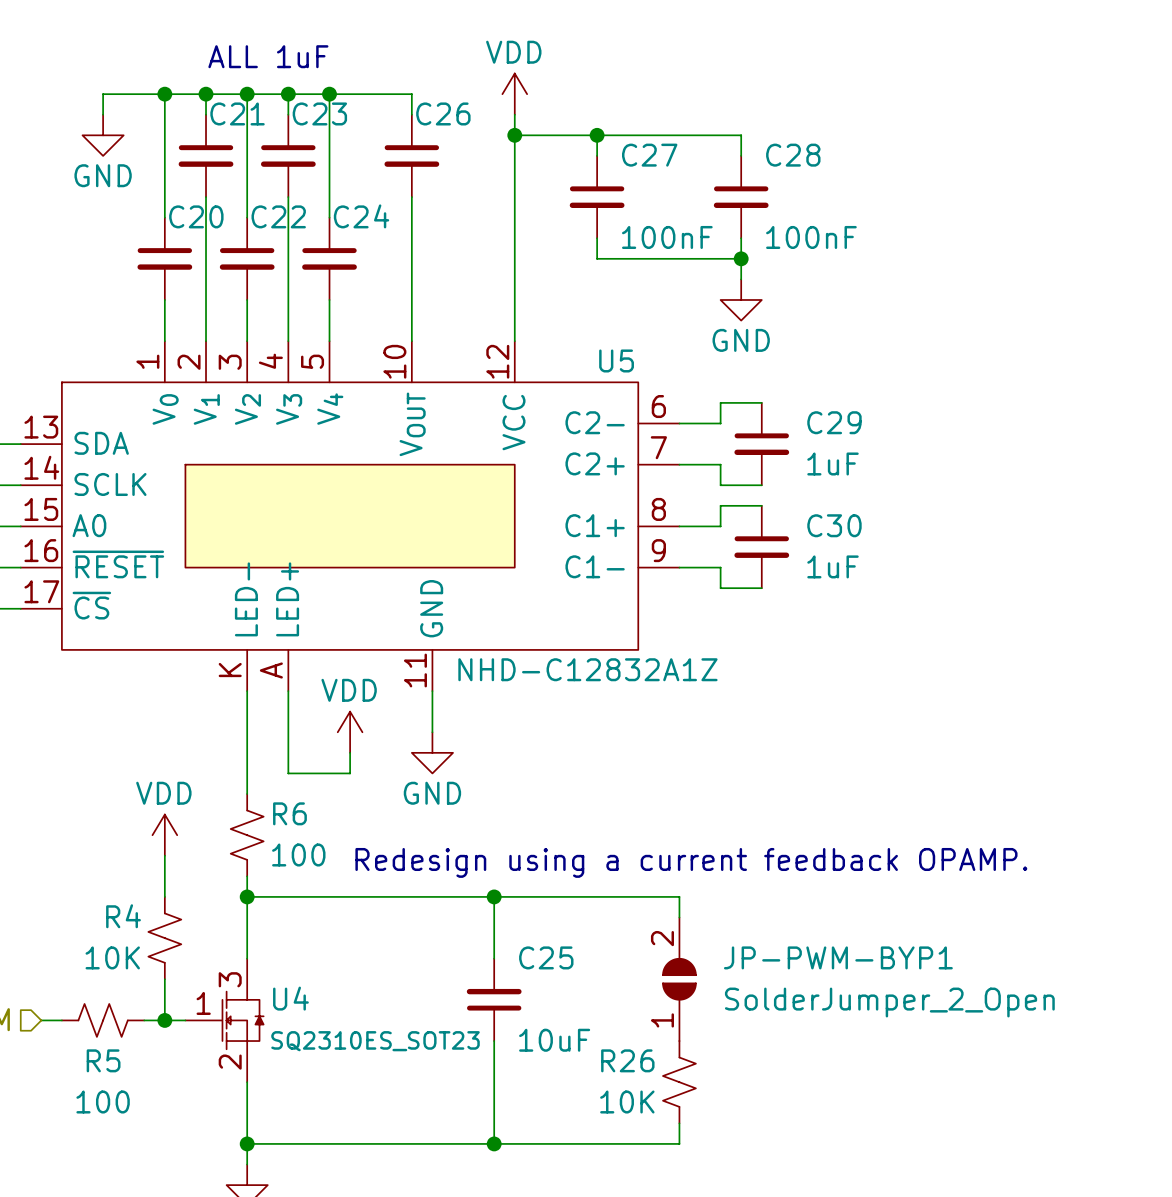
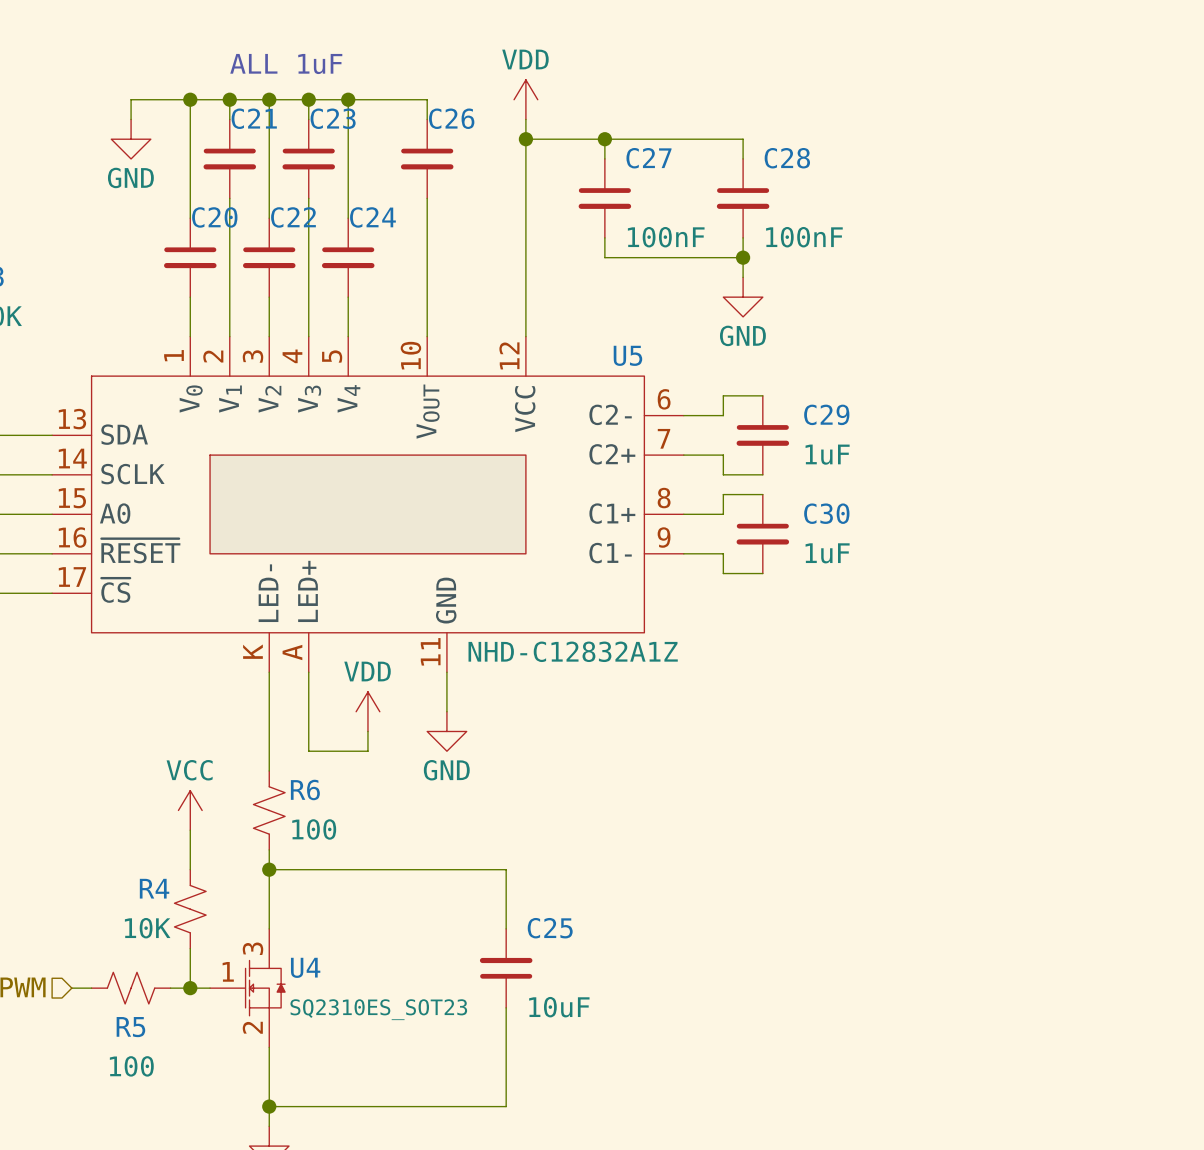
power symbol: VDD (164, 835) -> VCC (190, 810)
text: Redesign using a current feedback OPAMP. (691, 862) -> none
wire: (494, 896) (679, 896) (679, 917) -> none
junction: (494, 896) -> none
JP-PWM-BYP1: SolderJumper_2_Open (679, 979) -> none
R26: 10K (679, 1082) -> none
wire: (679, 1123) (679, 1143) (494, 1143) -> none
junction: (494, 1143) -> none

